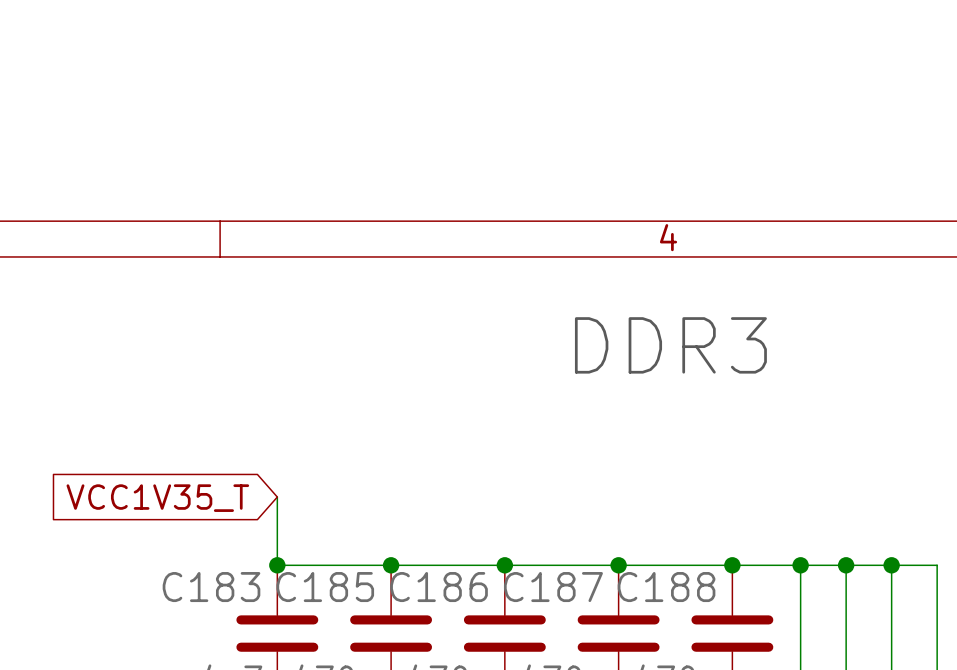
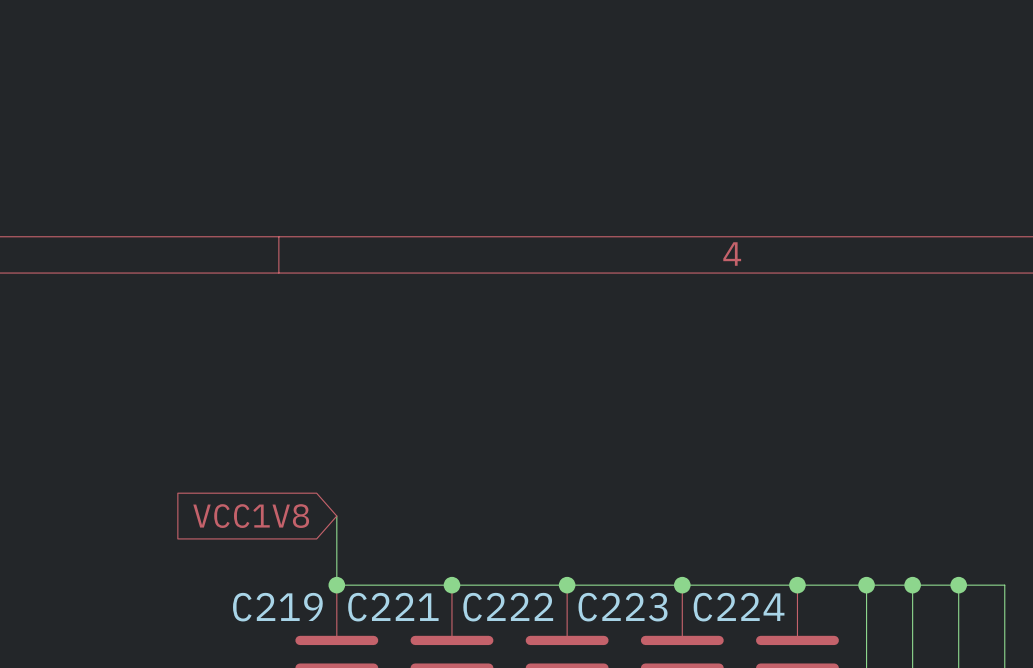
text: DDR3 (670, 345) -> none
global label: VCC1V35_T (157, 498) -> VCC1V8 (251, 516)
C183 name: C183 (211, 587) -> C219 (277, 607)
C185 name: C185 (325, 587) -> C221 (393, 607)
C186 name: C186 (439, 587) -> C222 (508, 607)
C187 name: C187 (553, 587) -> C223 (623, 607)
C188 name: C188 (666, 587) -> C224 (739, 607)

